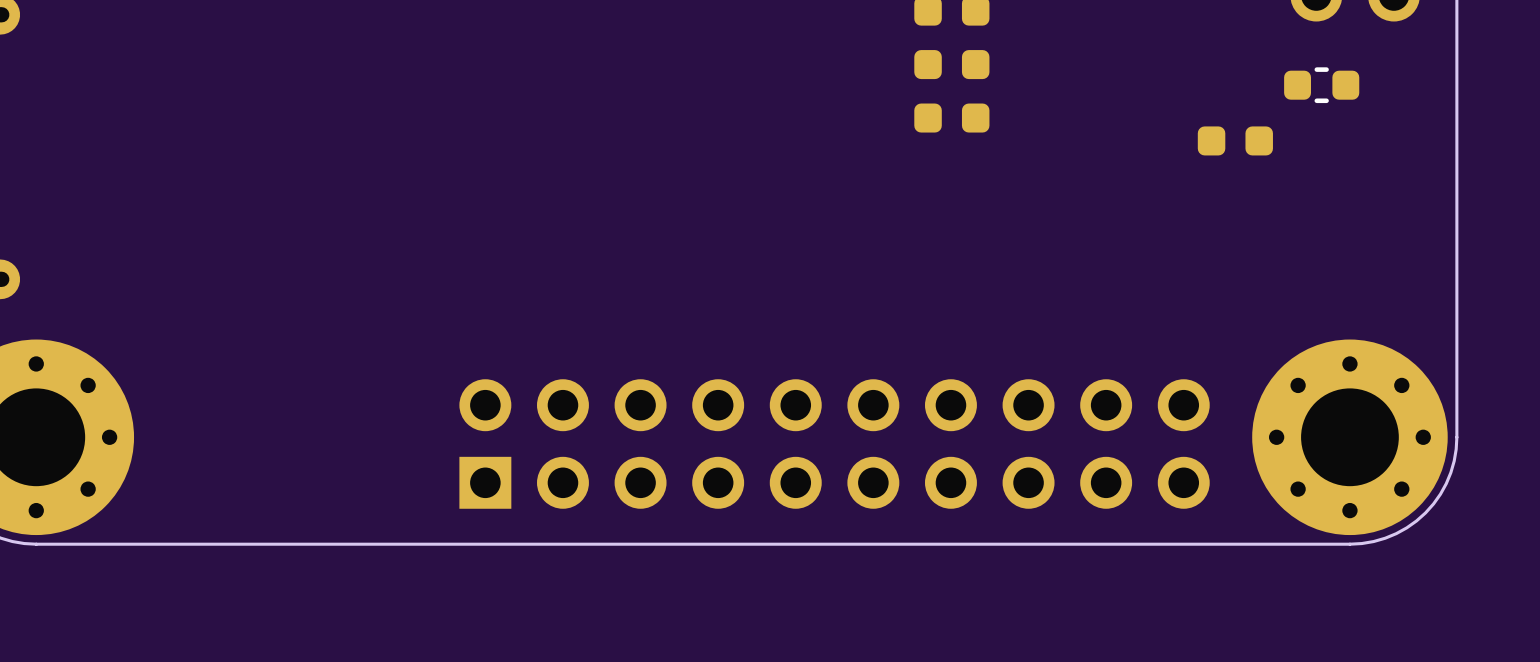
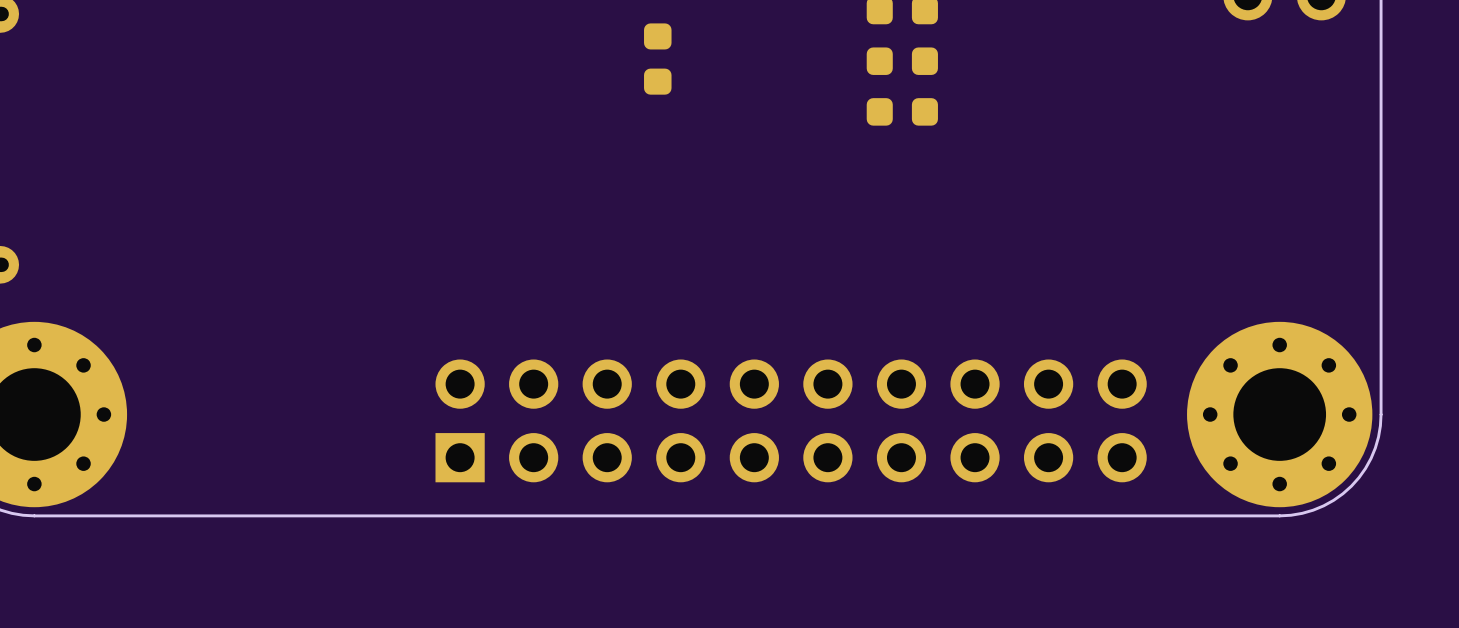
part: (1321, 85) -> none
part rotation: 0° (1235, 140) -> 90° clockwise (657, 59)
part position: (1235, 140) -> (657, 59)

